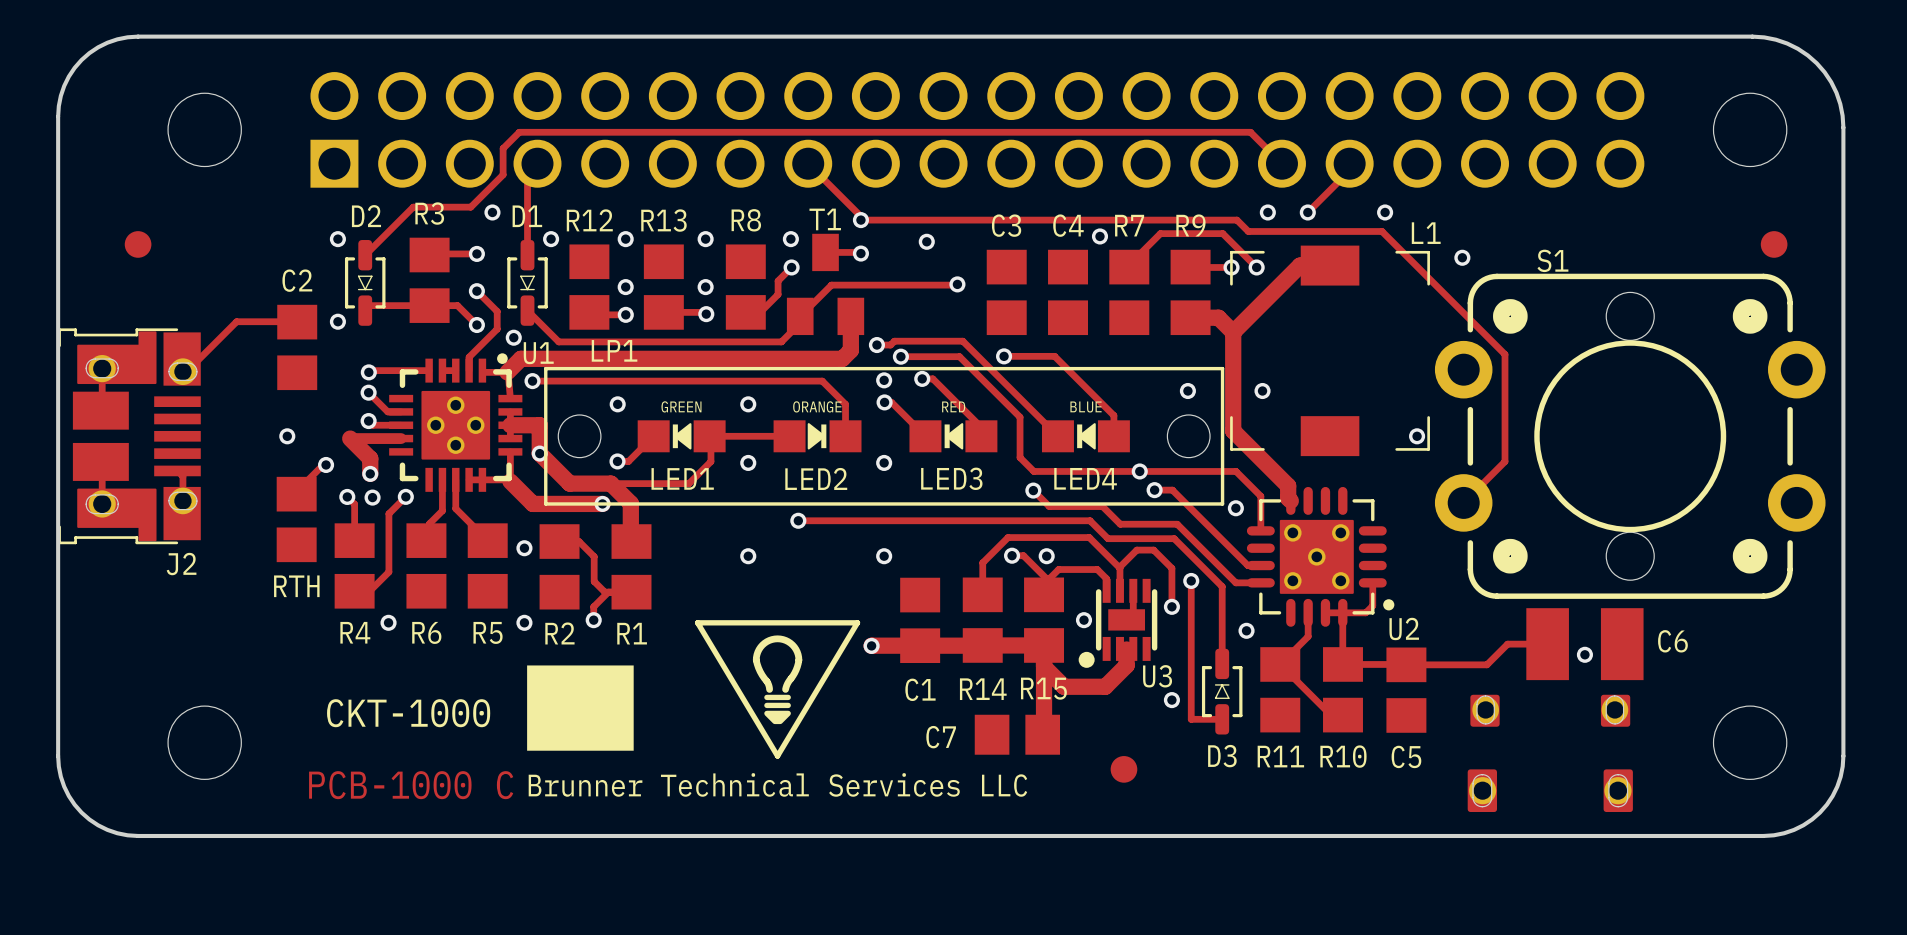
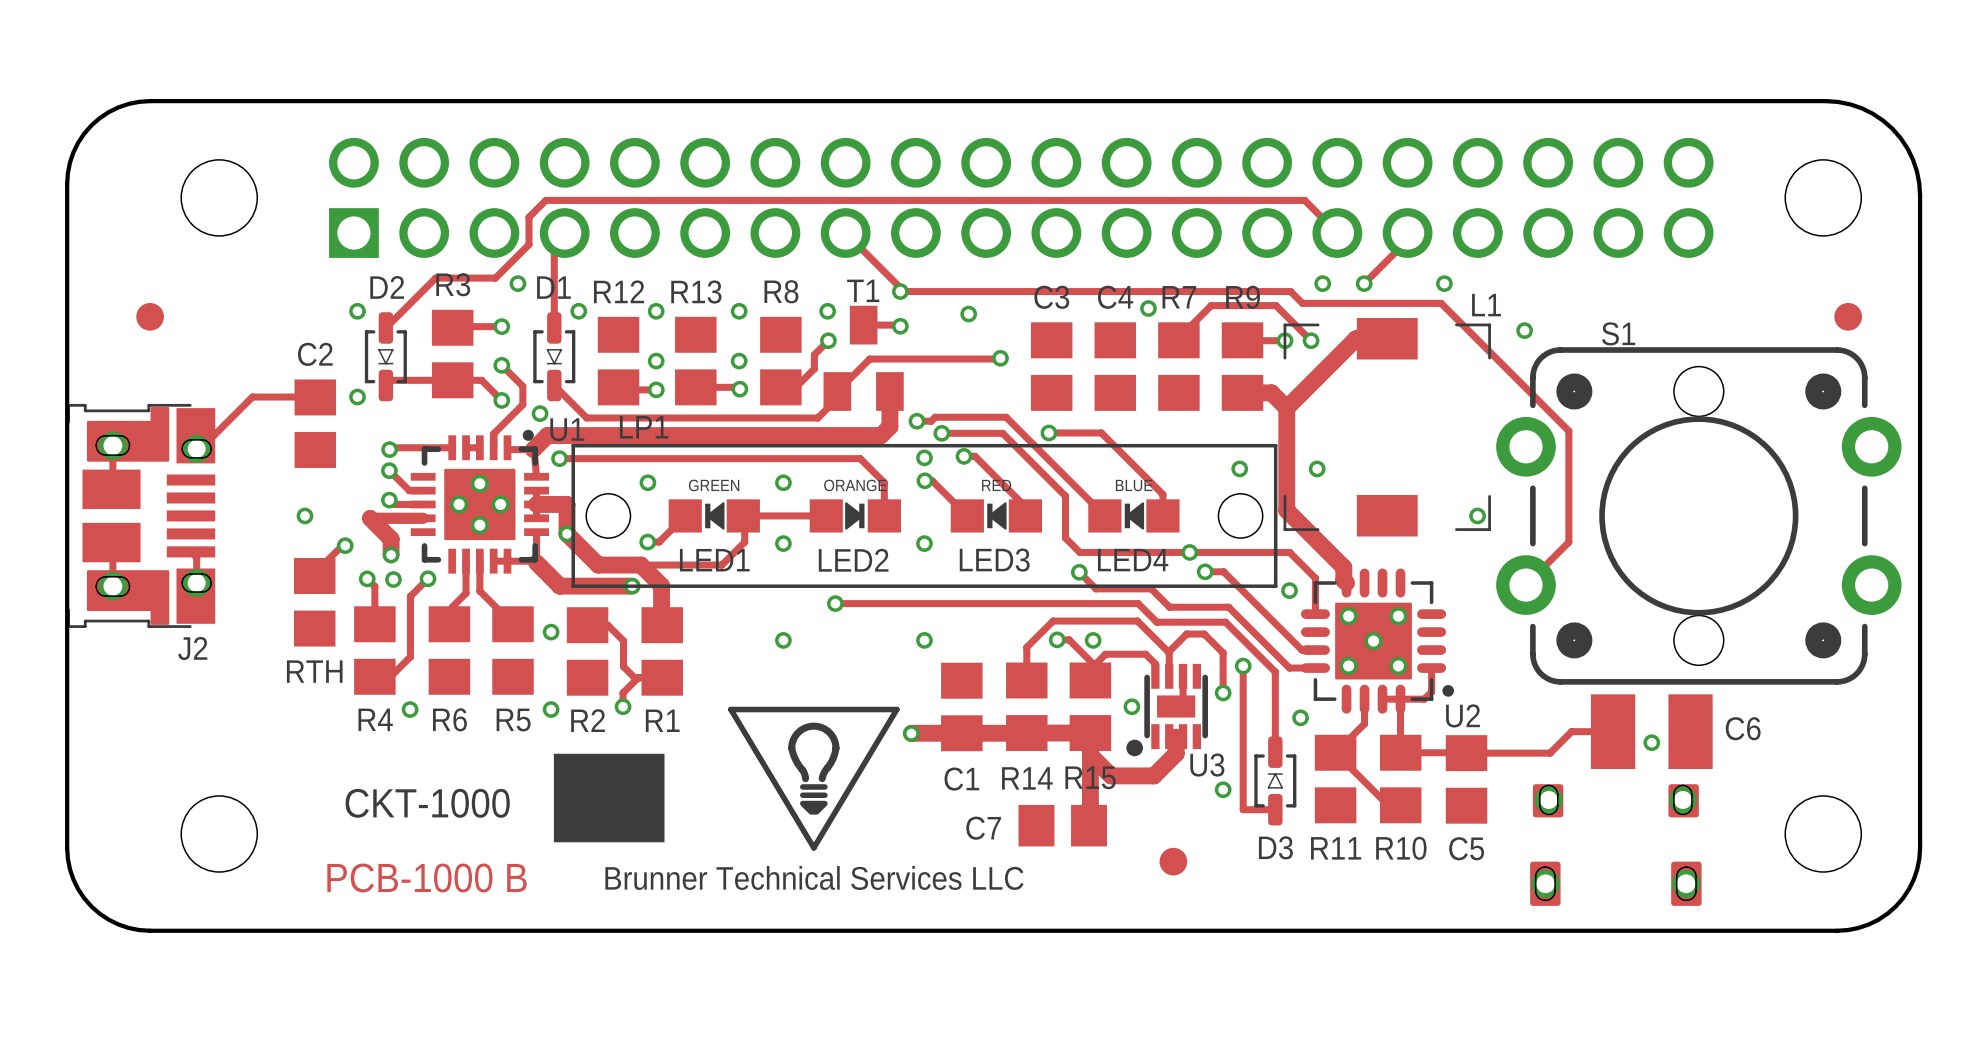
text: PCB-1000 C (411, 785) -> PCB-1000 B (427, 878)

